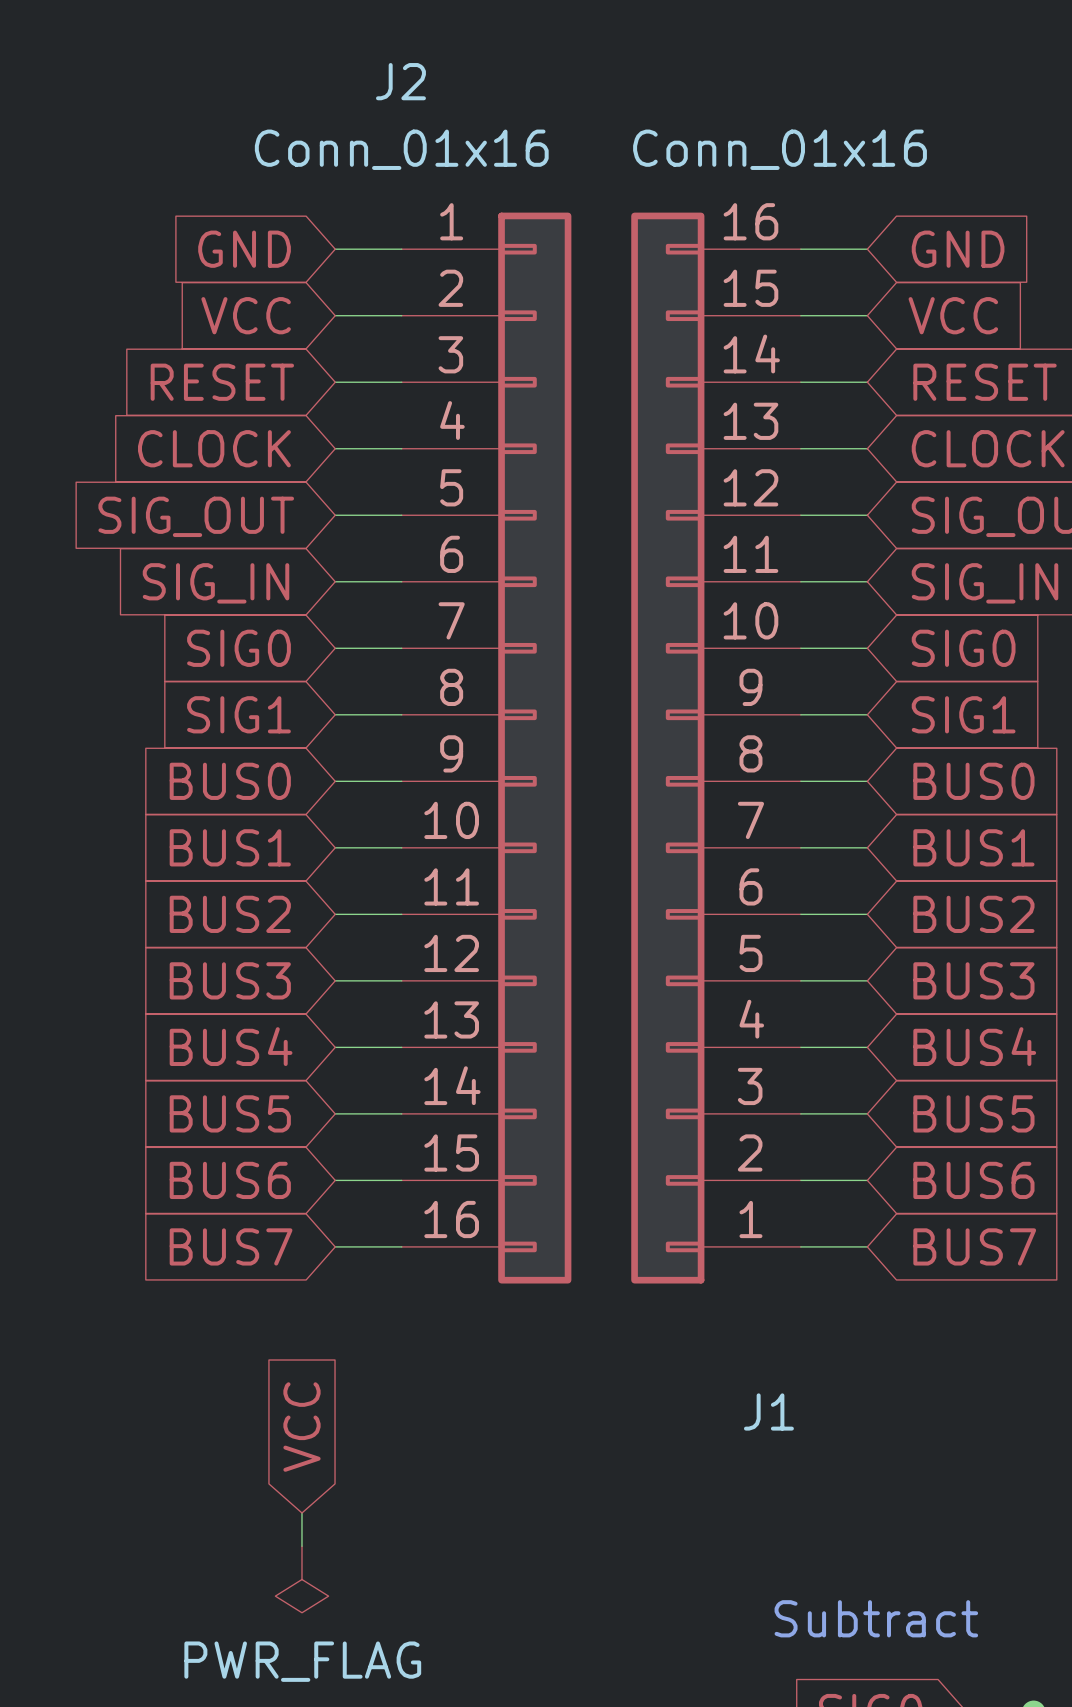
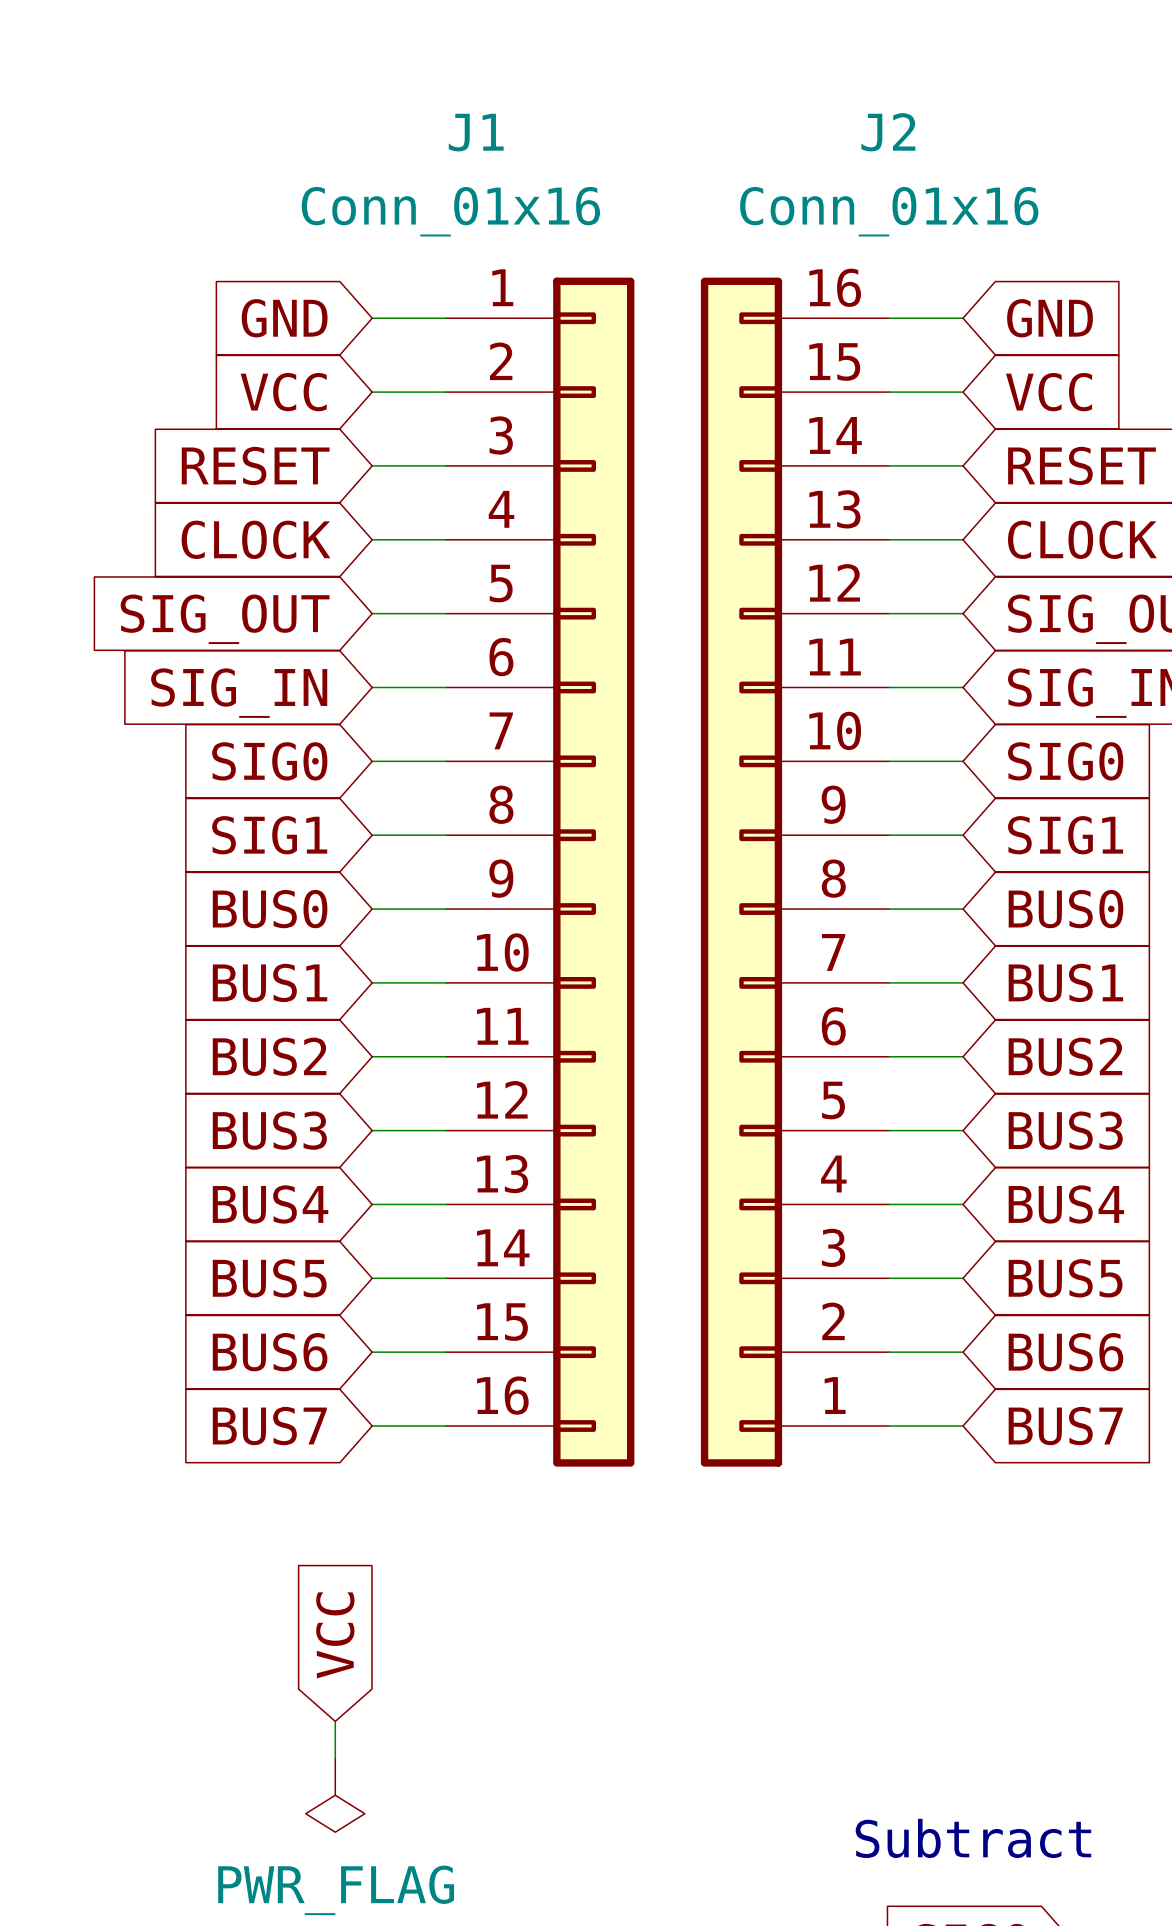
J2 name: J2 (400, 81) -> J1 (476, 132)
J2 value position: Conn_01x16 (401, 149) -> Conn_01x16 (450, 211)
J1 value position: Conn_01x16 (780, 149) -> Conn_01x16 (889, 211)
J1 name: J1 (768, 1411) -> J2 (888, 132)

